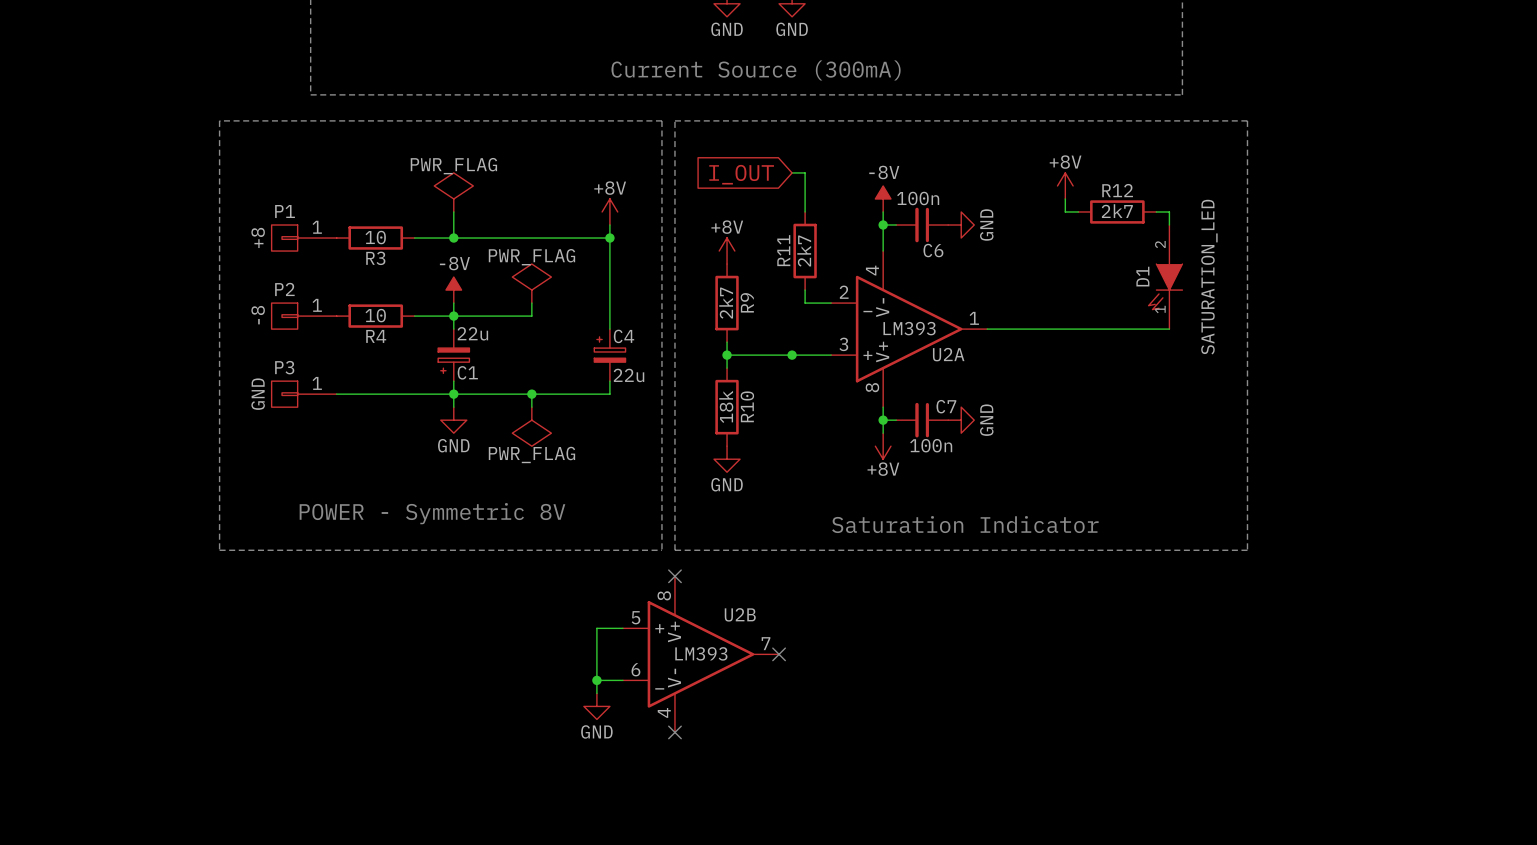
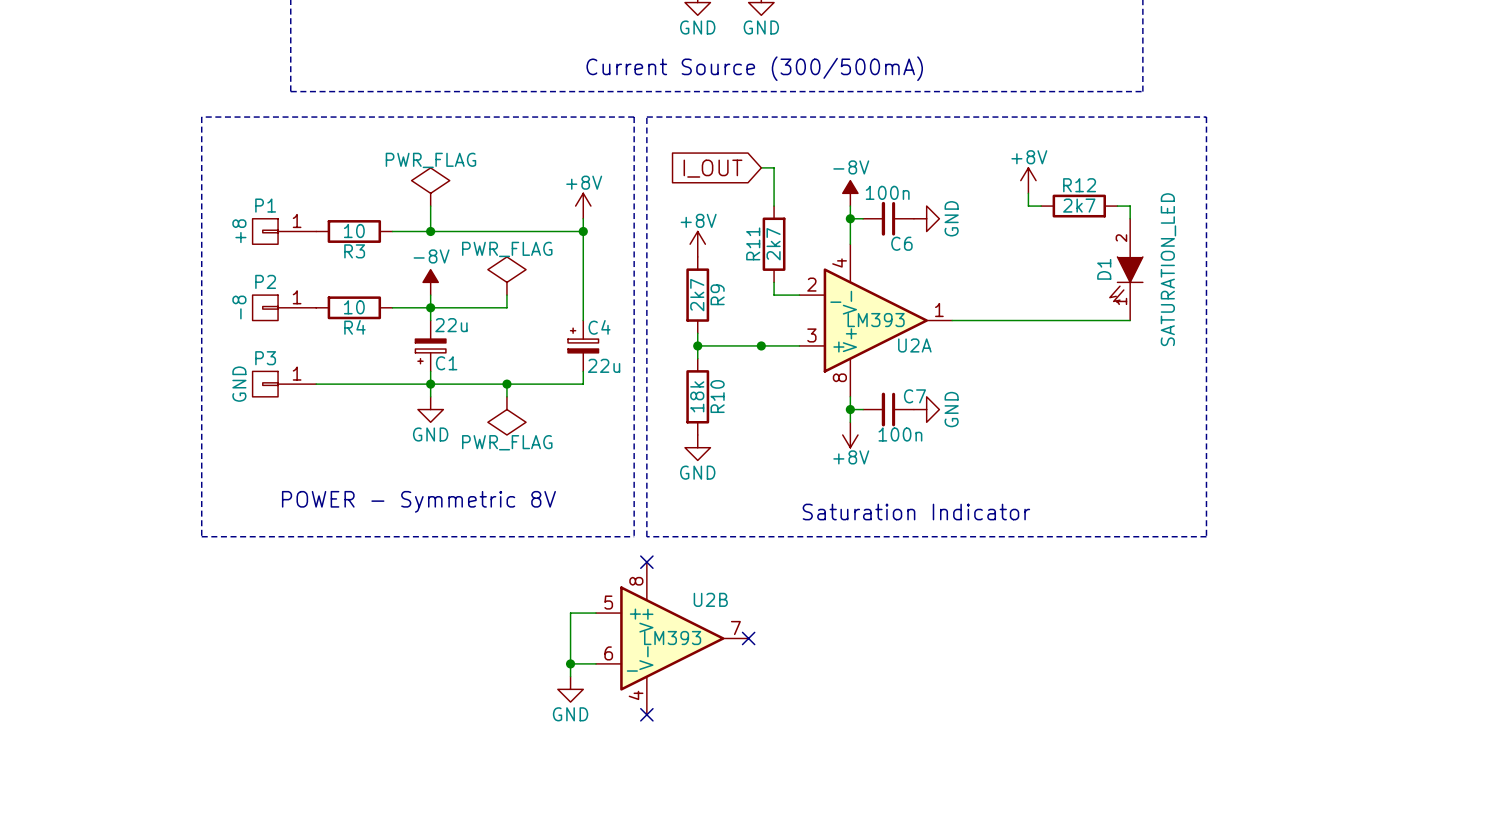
text: Current Source (300mA) (756, 70) -> Current Source (300/500mA) (754, 68)

